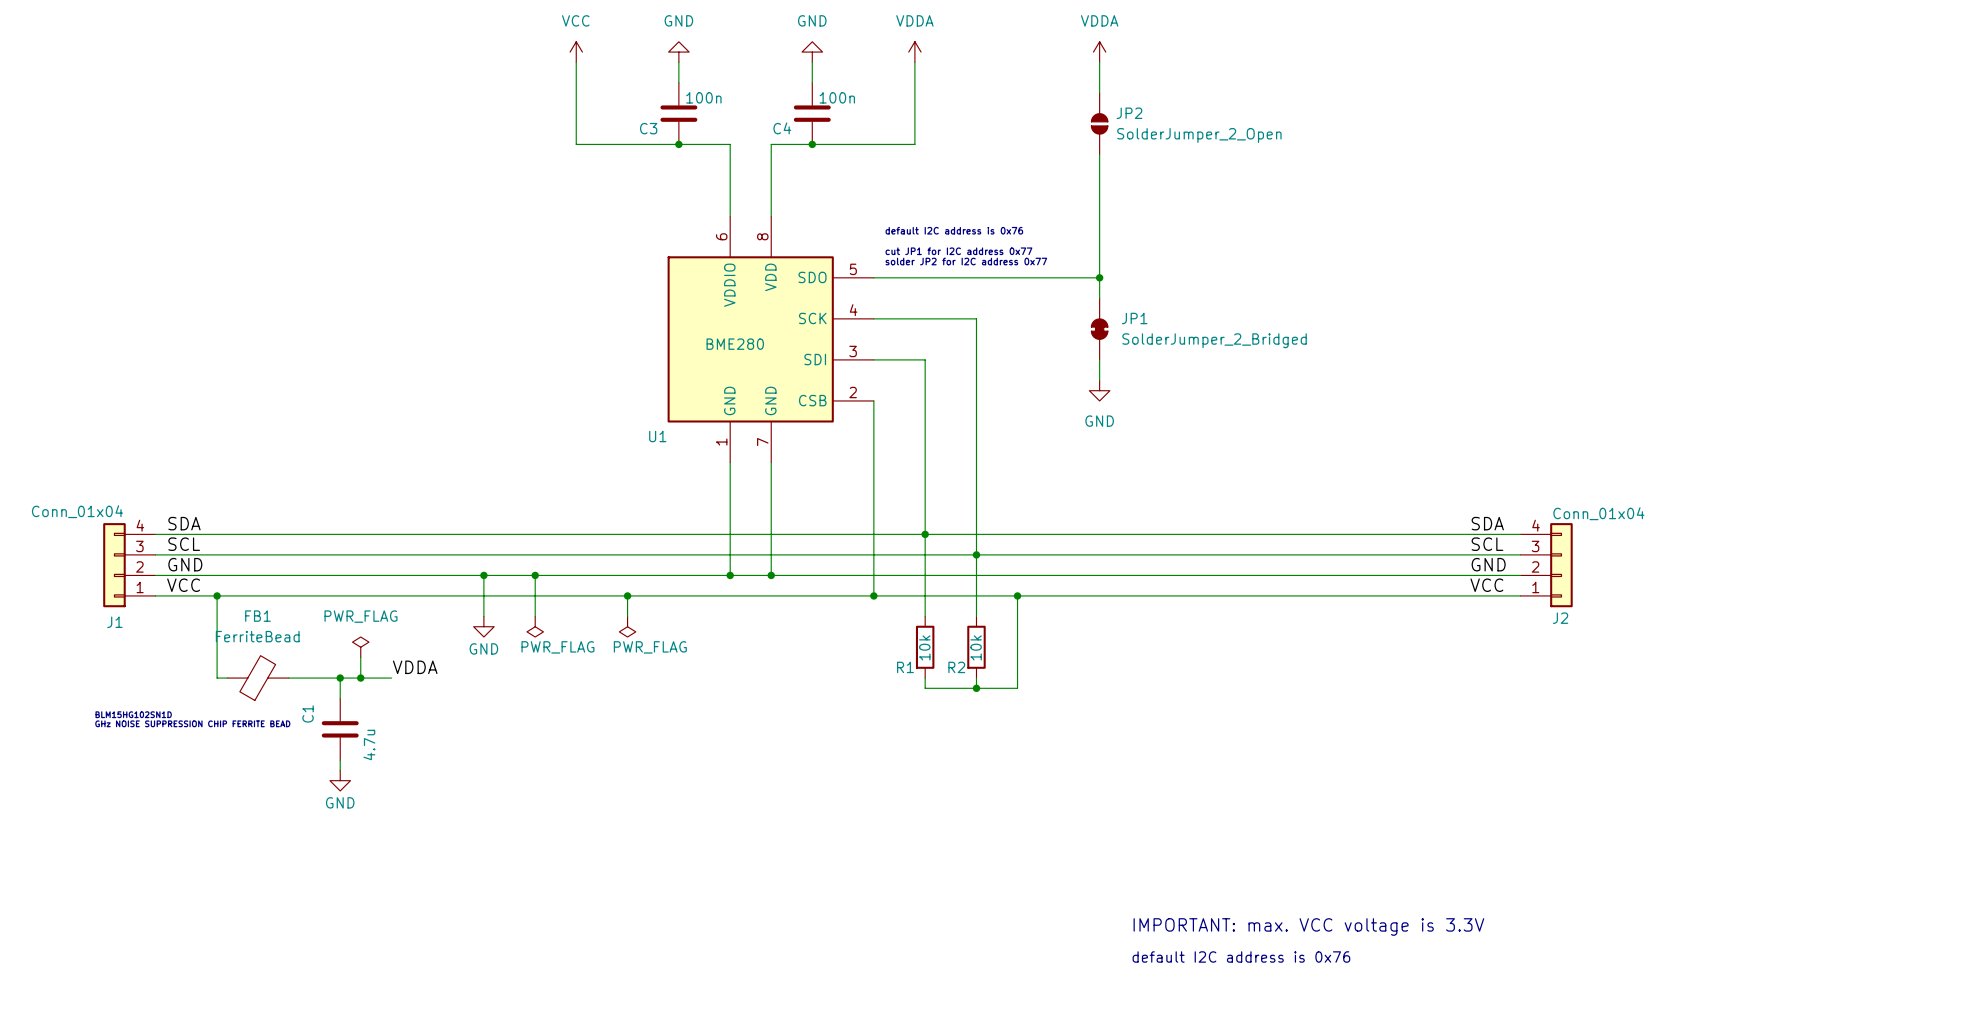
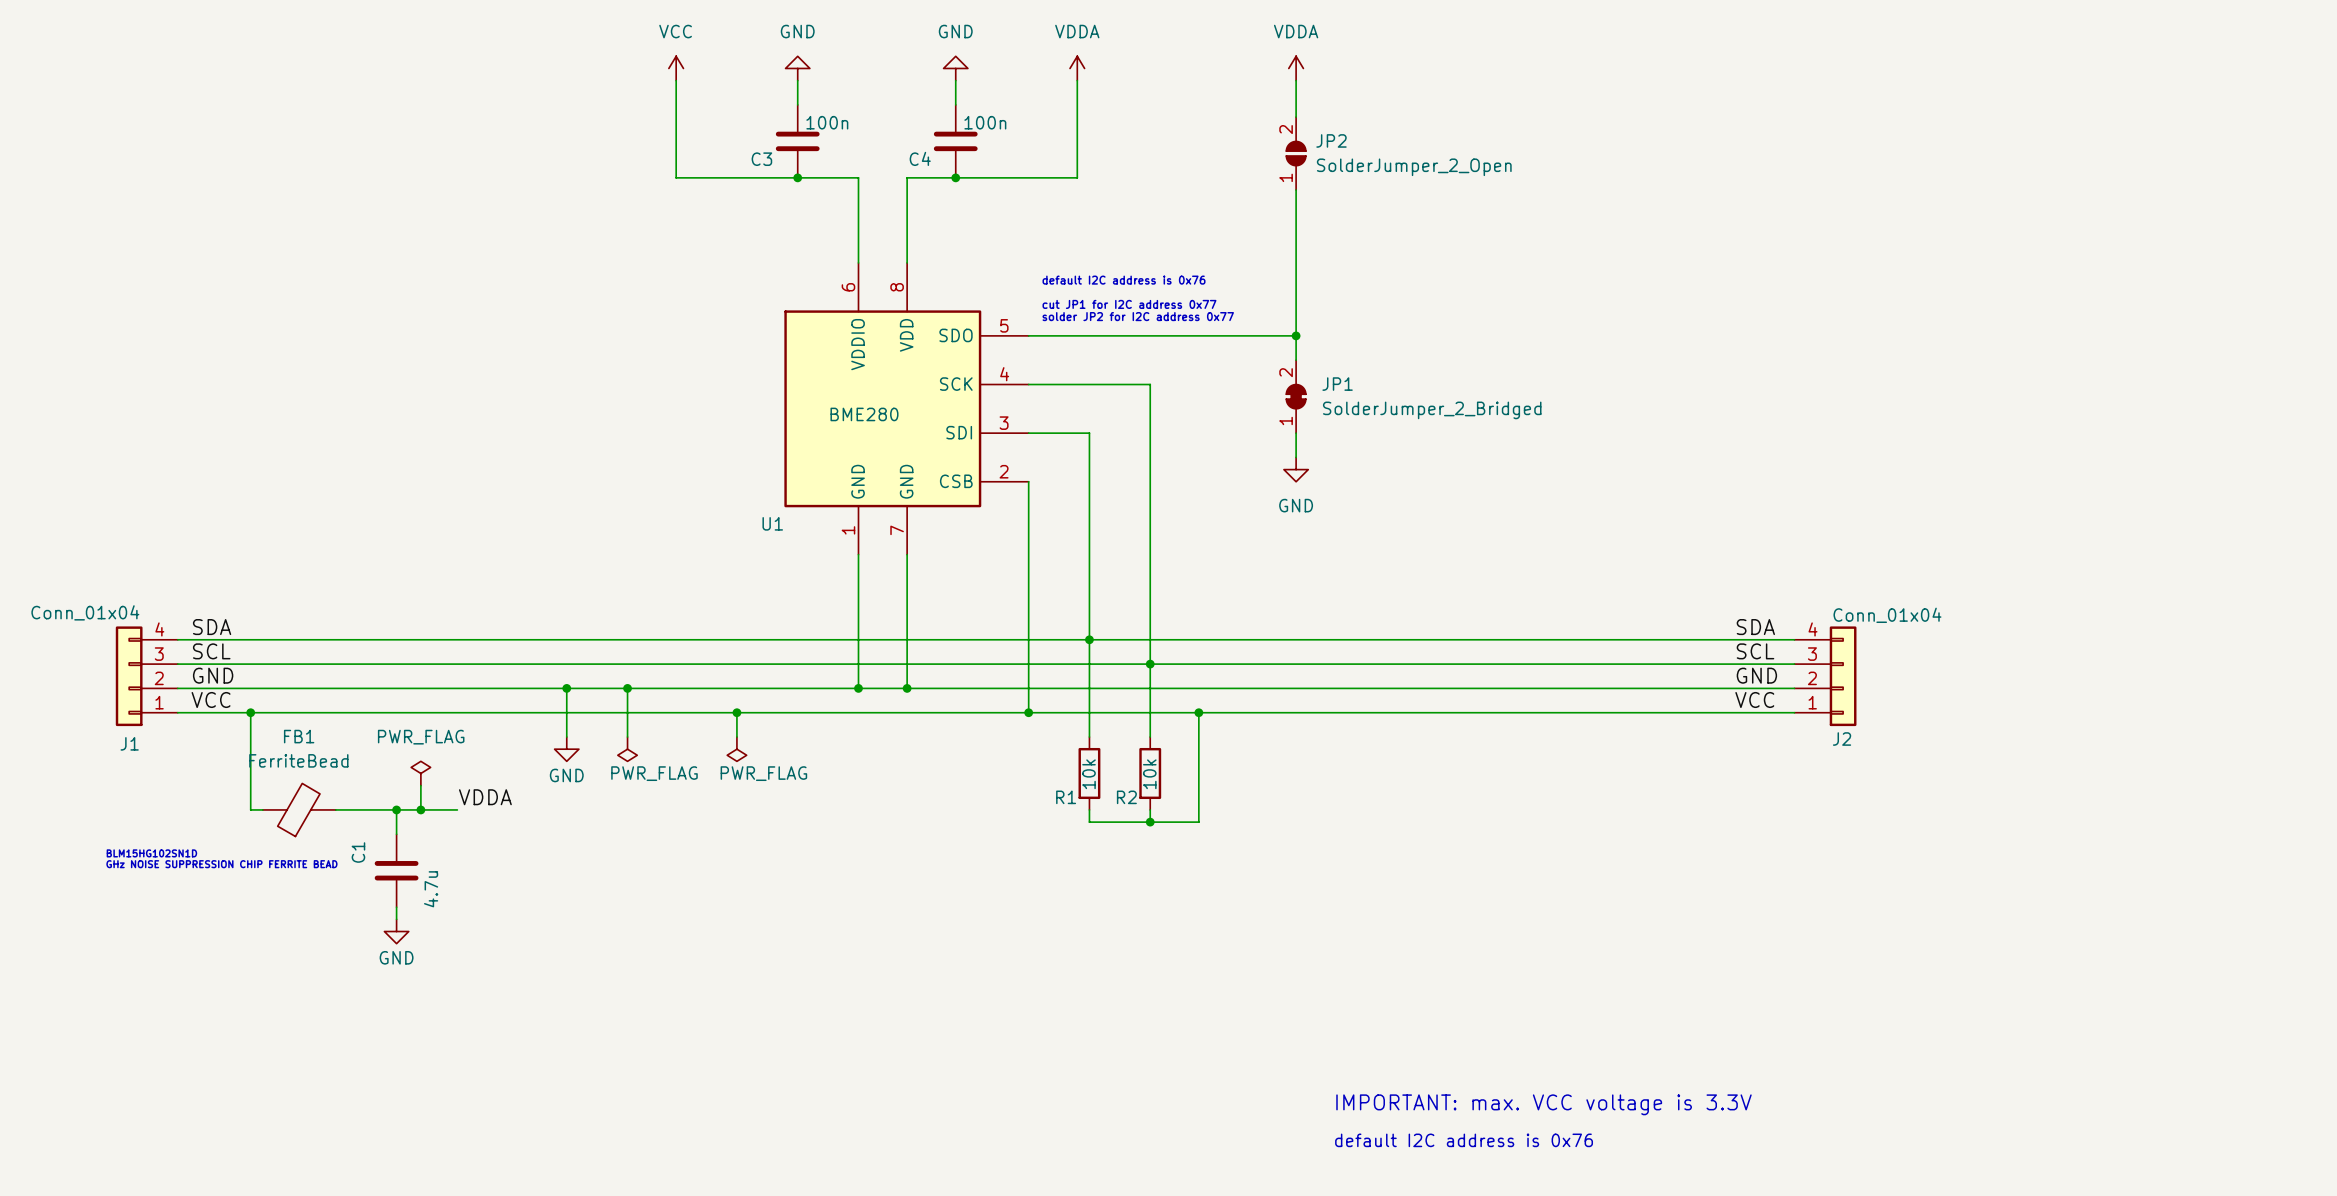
JP2 pin number: none -> 2 (1286, 129)
JP2 pin number: none -> 1 (1286, 177)
JP1 pin number: none -> 2 (1286, 372)
JP1 pin number: none -> 1 (1286, 420)

